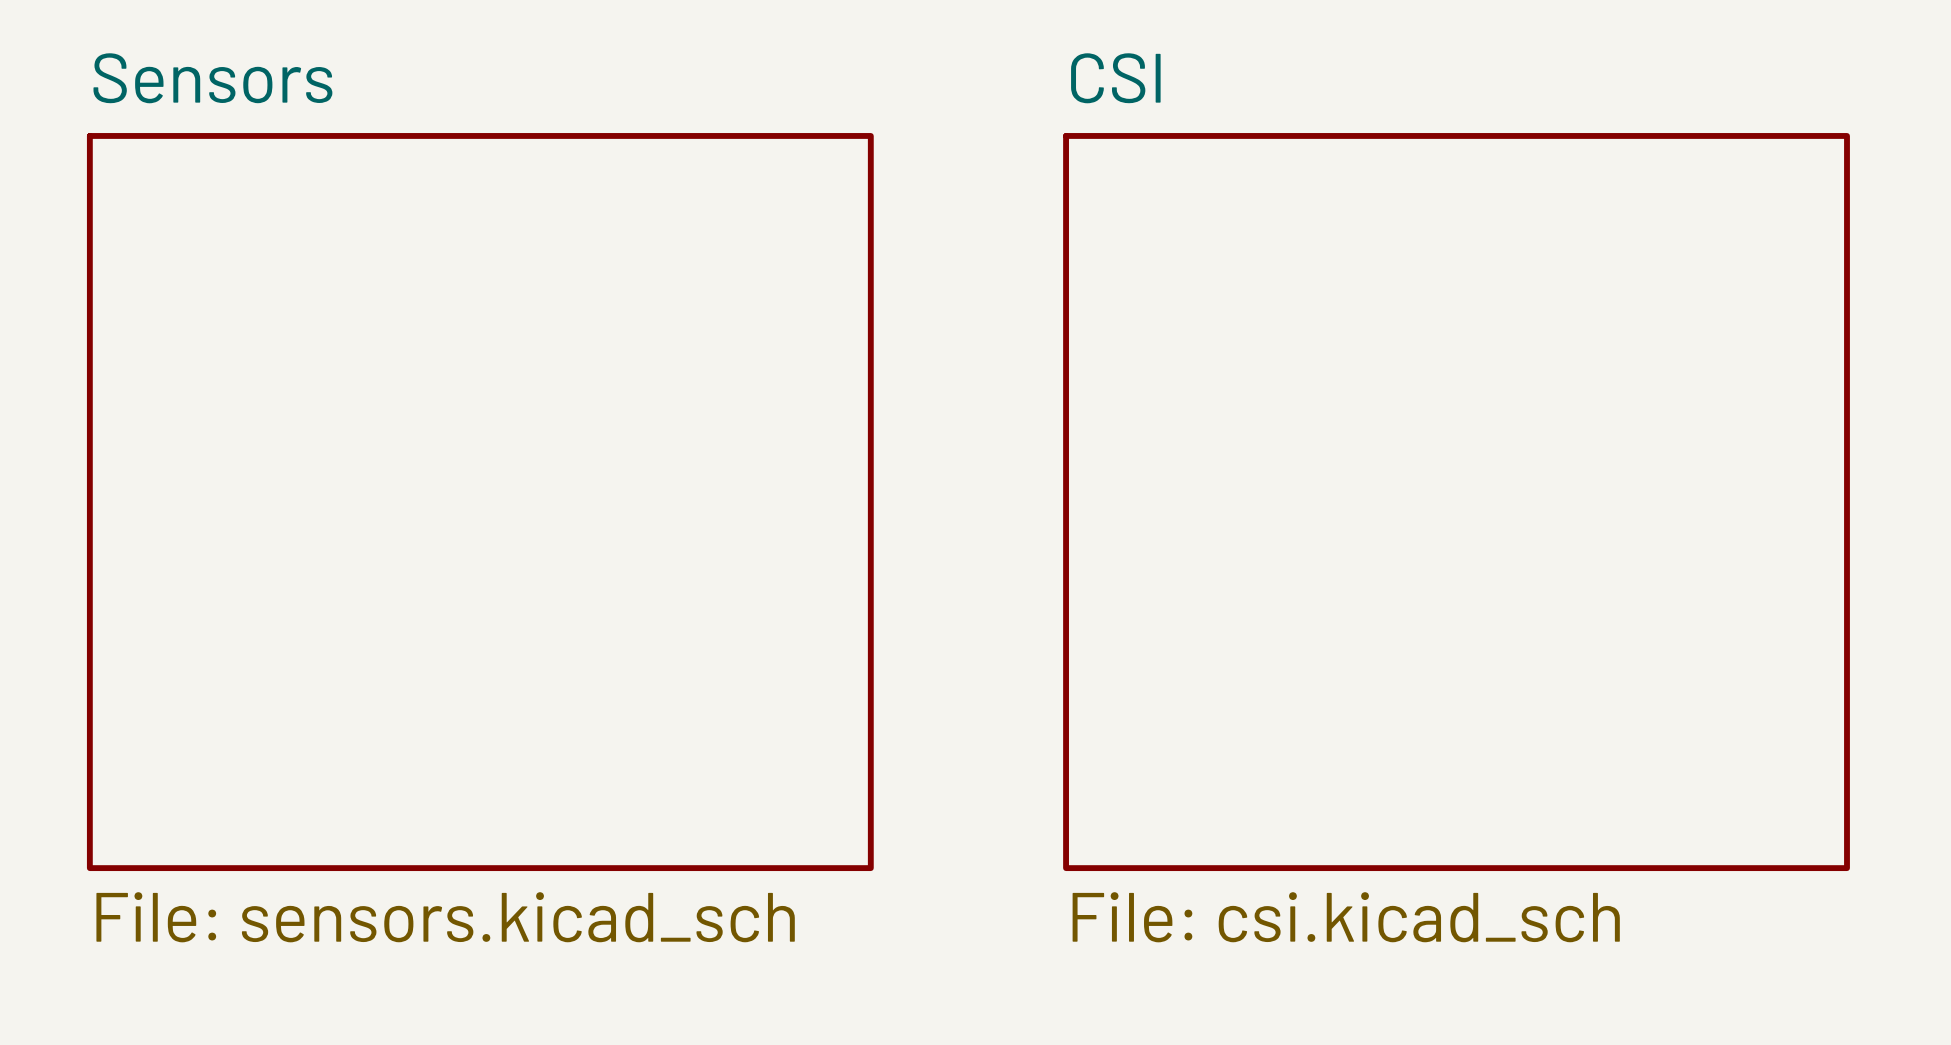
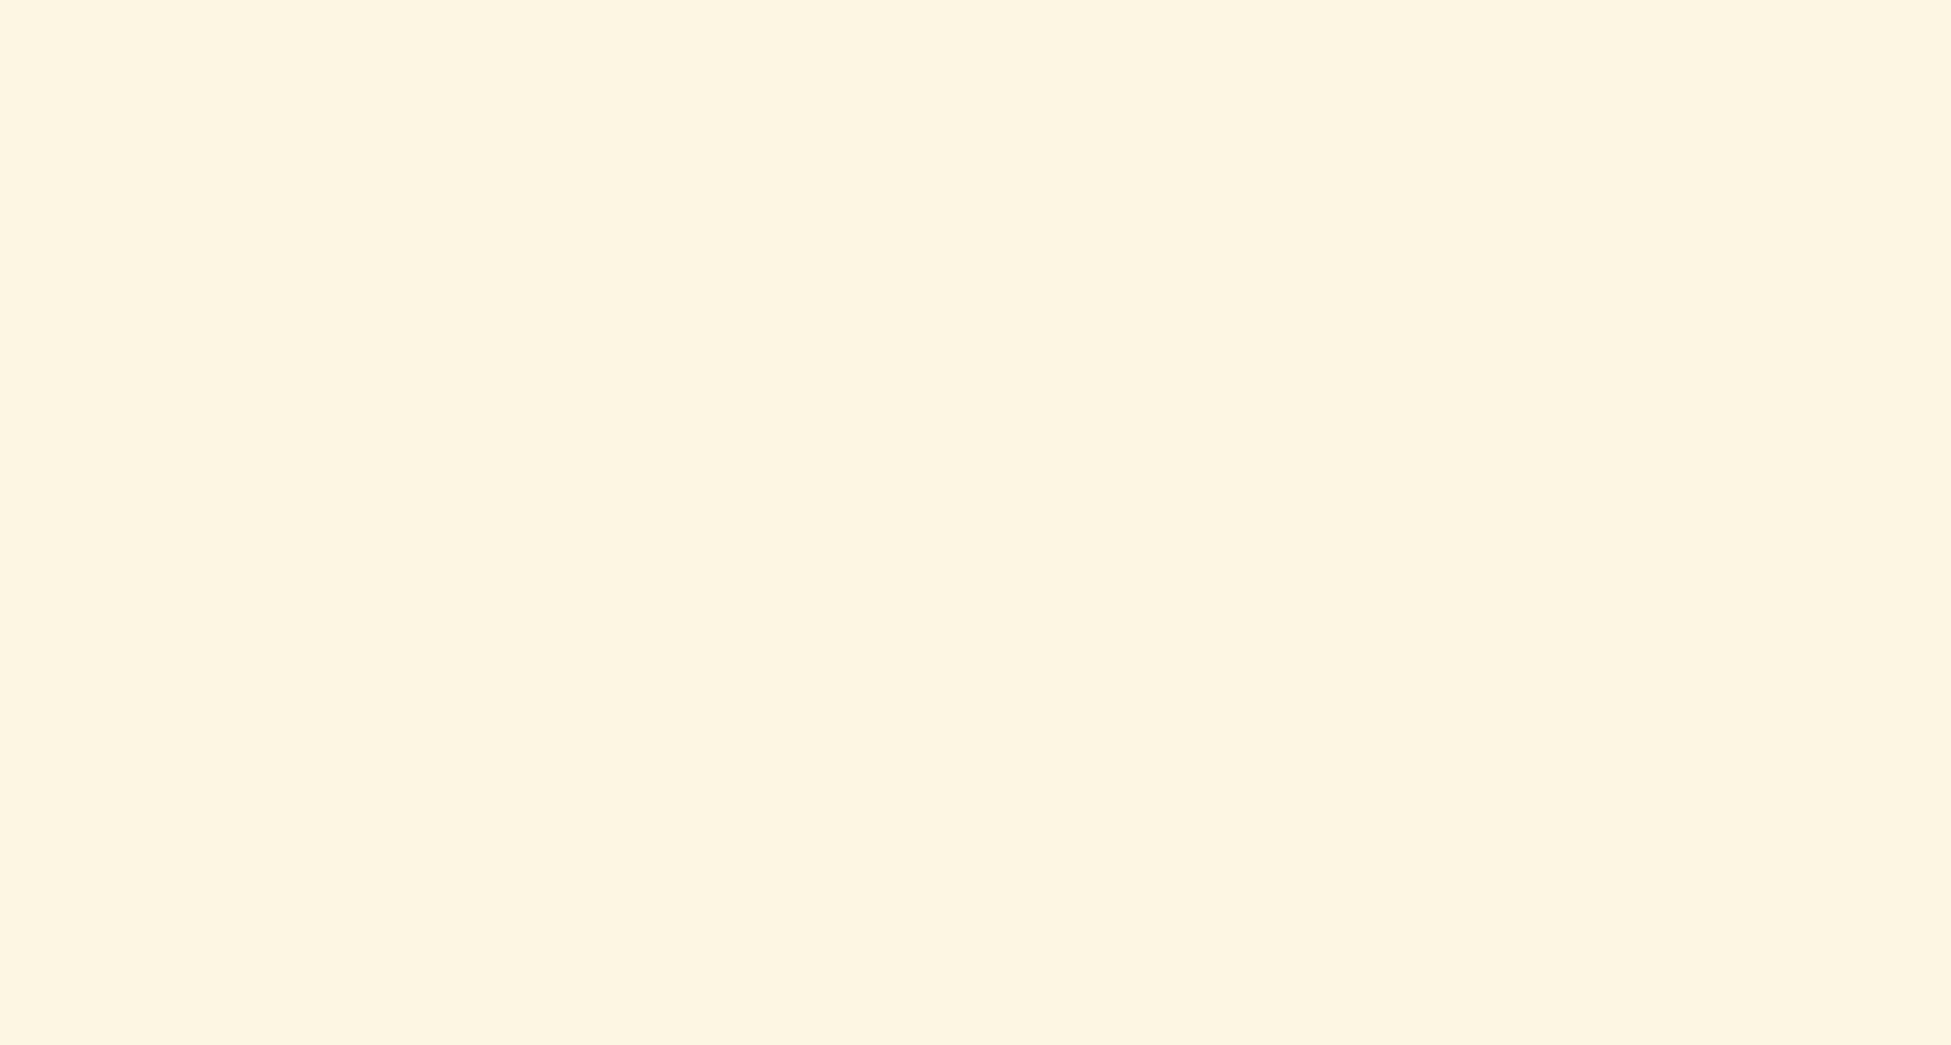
sheet Sensors: File: sensors.kicad_sch (480, 502) -> none
sheet CSI: File: csi.kicad_sch (1456, 502) -> none

